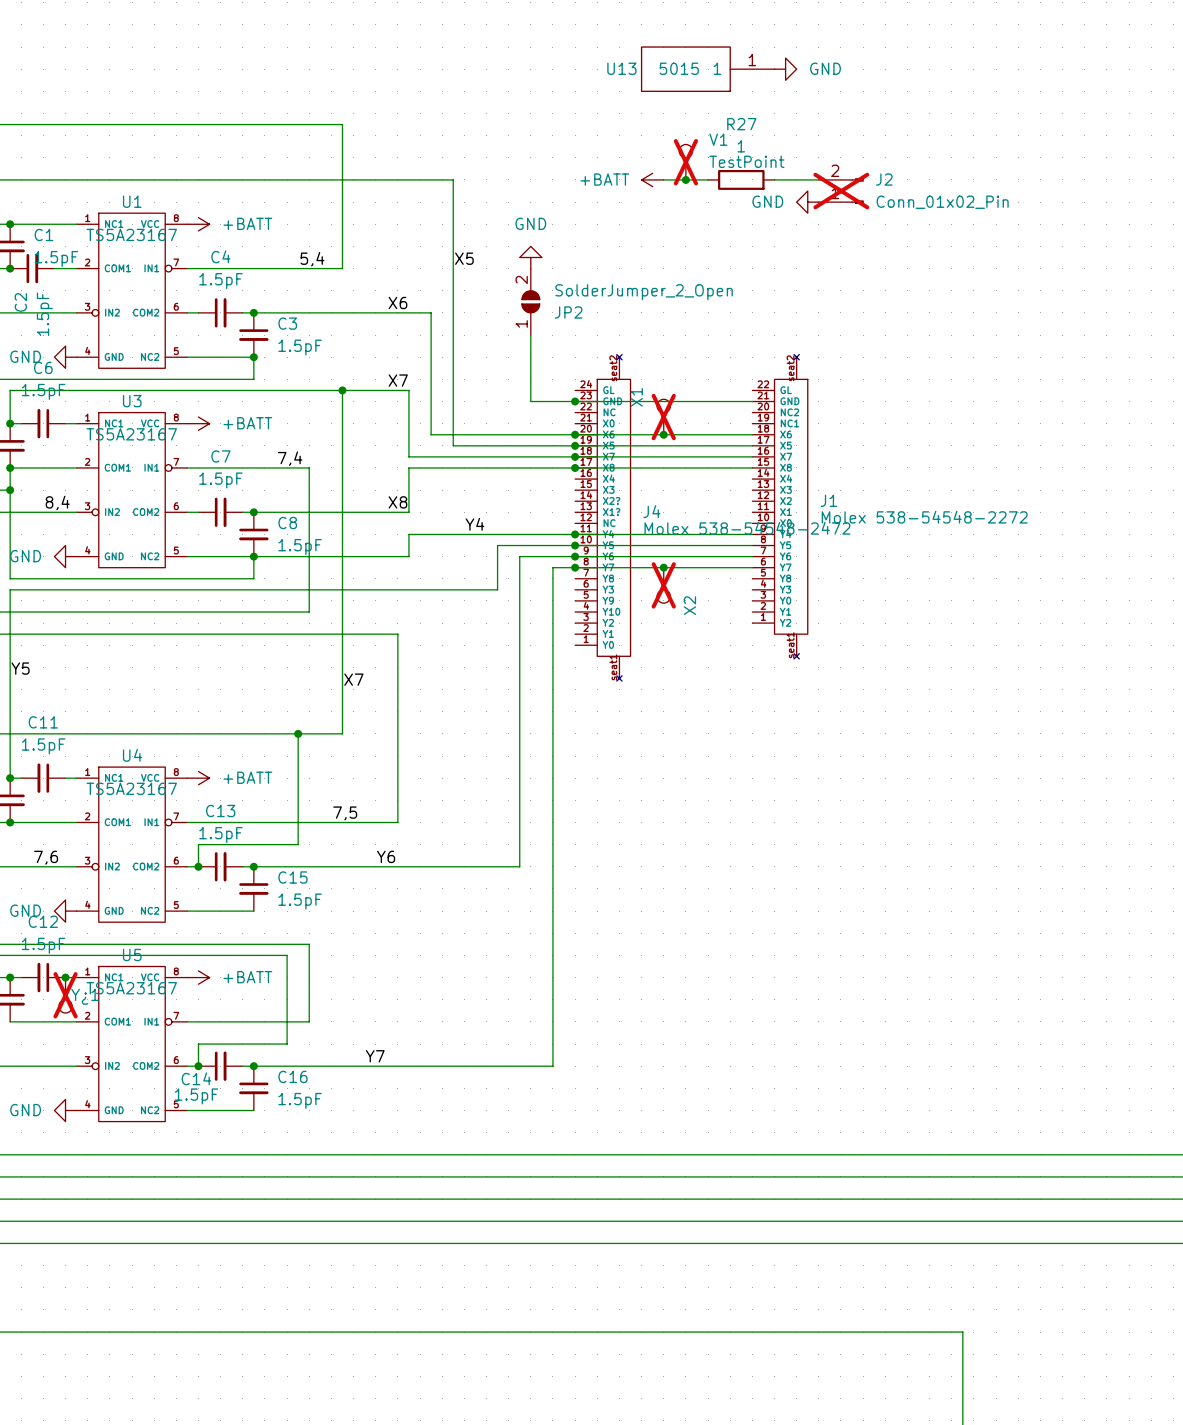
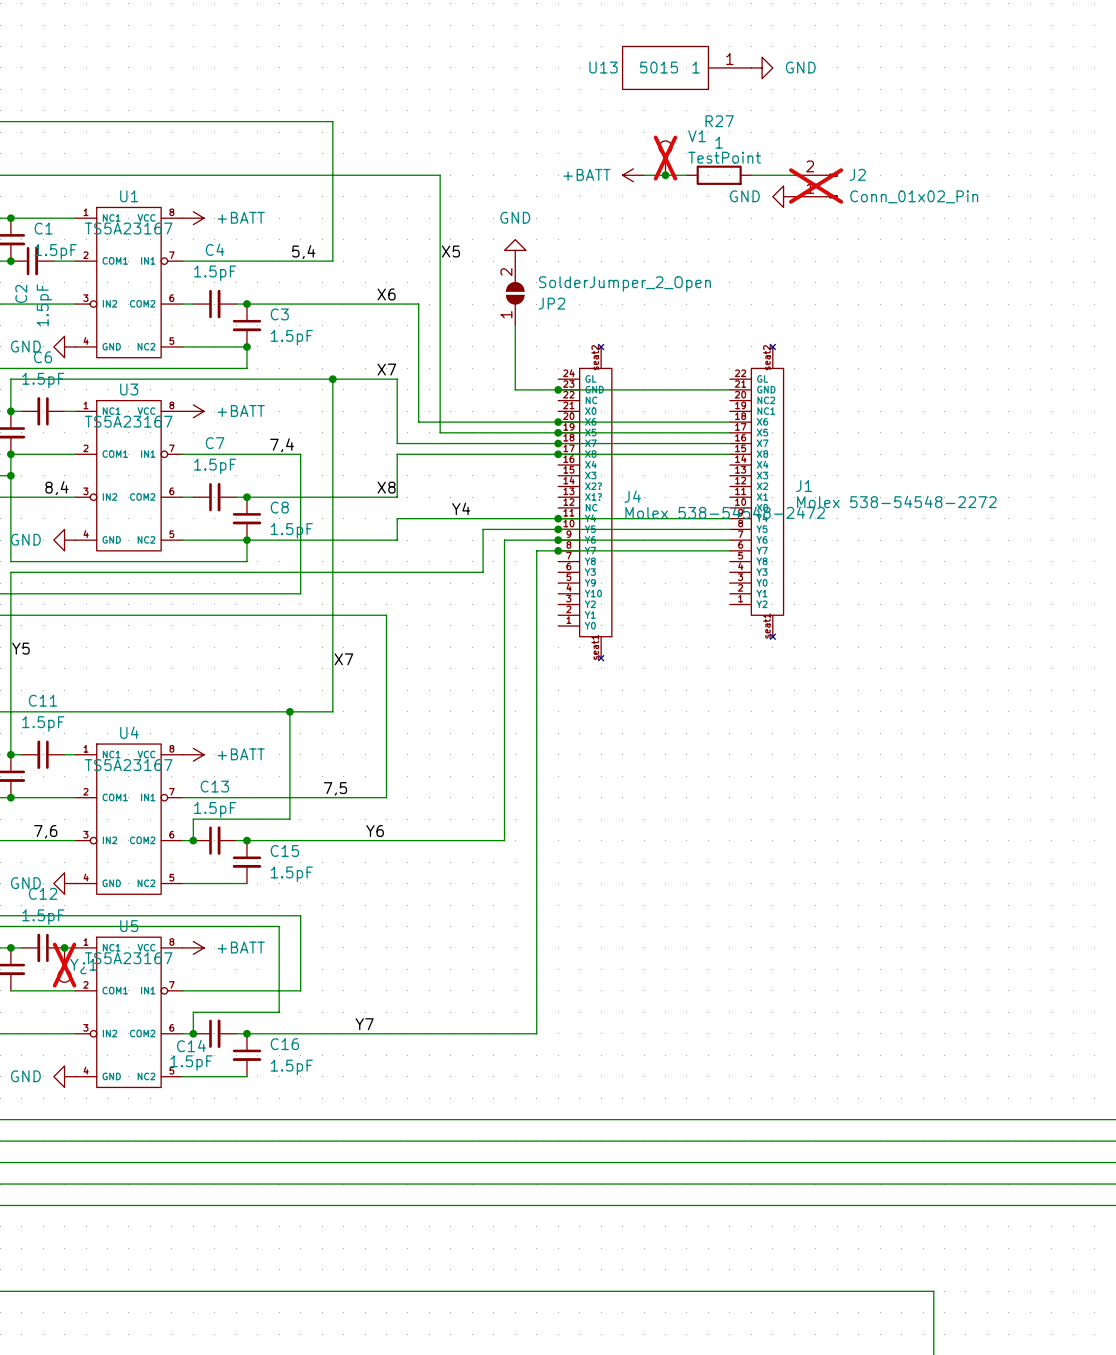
X1: (663, 417) -> none
junction: (663, 434) -> none
junction: (663, 567) -> none
X2: (663, 585) -> none

